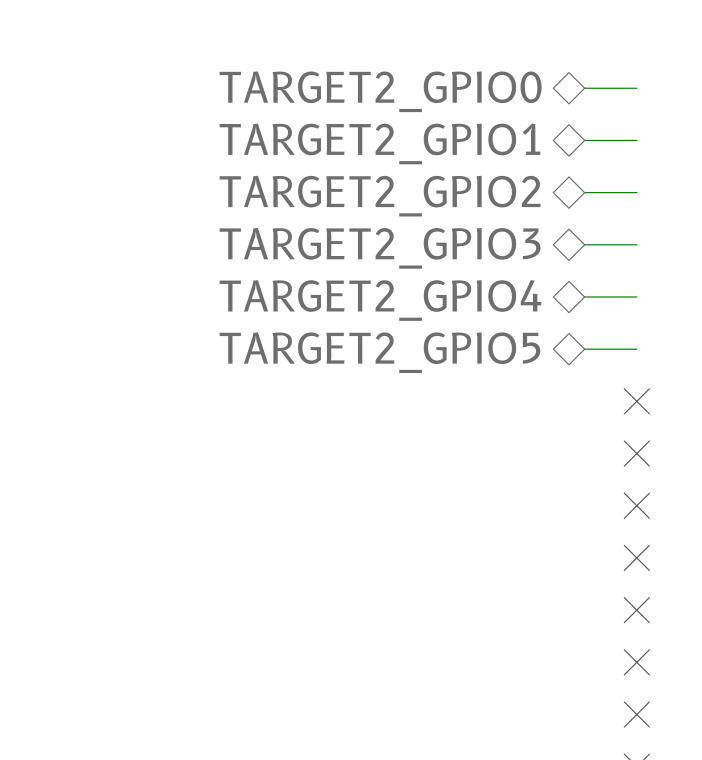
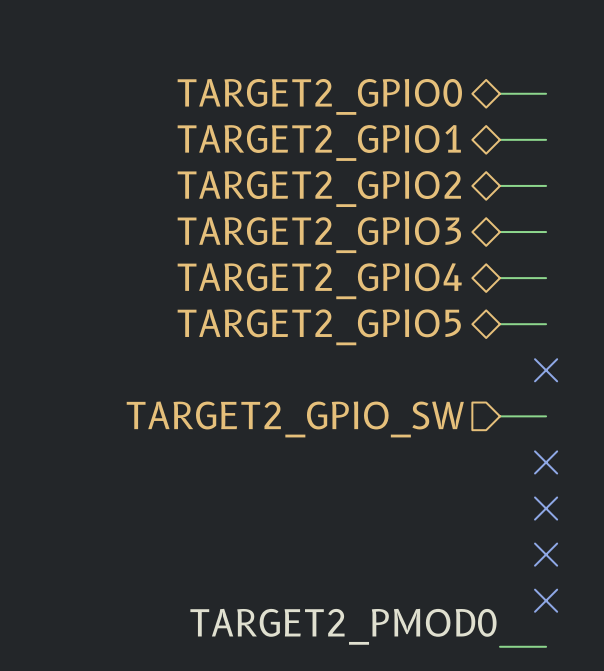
wire: none -> (500, 416) (546, 416)
no-connect mark: (636, 453) -> none
hierarchical label: none -> TARGET2_GPIO_SW (295, 419)
label: none -> TARGET2_PMOD0 (343, 626)
wire: none -> (500, 646) (546, 646)
no-connect mark: (636, 714) -> none

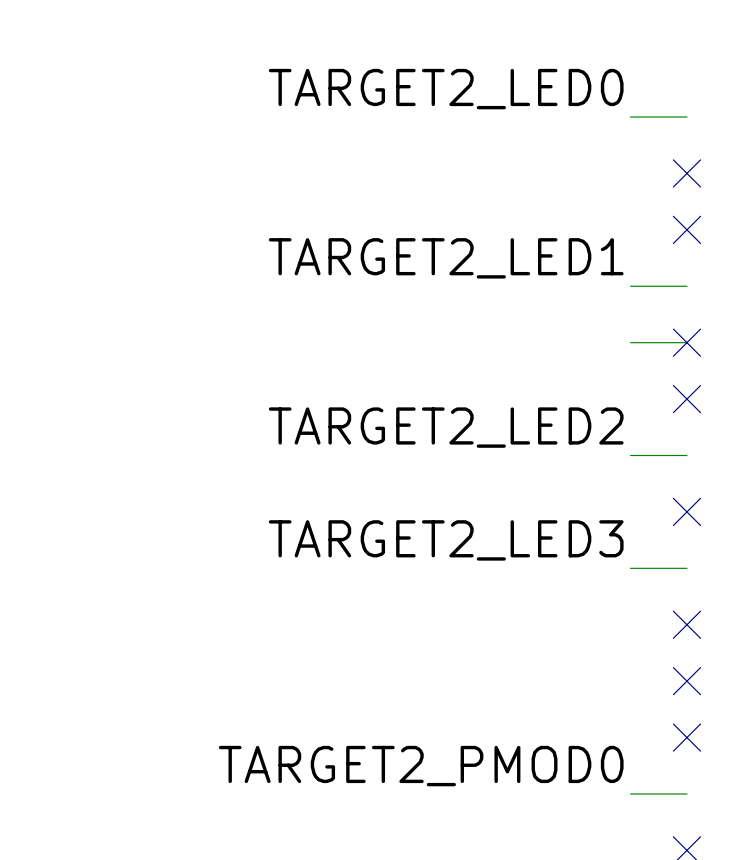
label: none -> TARGET2_LED0 (446, 89)
hierarchical label: TARGET2_GPIO0 (319, 96) -> none
wire: (500, 139) (546, 139) -> none
no-connect mark: none -> (686, 173)
hierarchical label: TARGET2_GPIO1 (319, 142) -> none
wire: (500, 185) (546, 185) -> none
no-connect mark: none -> (686, 229)
hierarchical label: TARGET2_GPIO2 (319, 189) -> none
label: none -> TARGET2_LED1 (446, 258)
hierarchical label: TARGET2_GPIO3 (319, 235) -> none
no-connect mark: none -> (686, 342)
hierarchical label: TARGET2_GPIO4 (319, 281) -> none
wire: (500, 324) (546, 324) -> (630, 455) (686, 455)
no-connect mark: none -> (686, 399)
hierarchical label: TARGET2_GPIO5 (319, 327) -> none
label: none -> TARGET2_LED2 (446, 427)
no-connect mark: (546, 370) -> none
wire: (500, 416) (546, 416) -> (630, 568) (686, 568)
no-connect mark: none -> (686, 511)
hierarchical label: TARGET2_GPIO_SW (295, 419) -> none
label: none -> TARGET2_LED3 (446, 540)
no-connect mark: (546, 462) -> none

